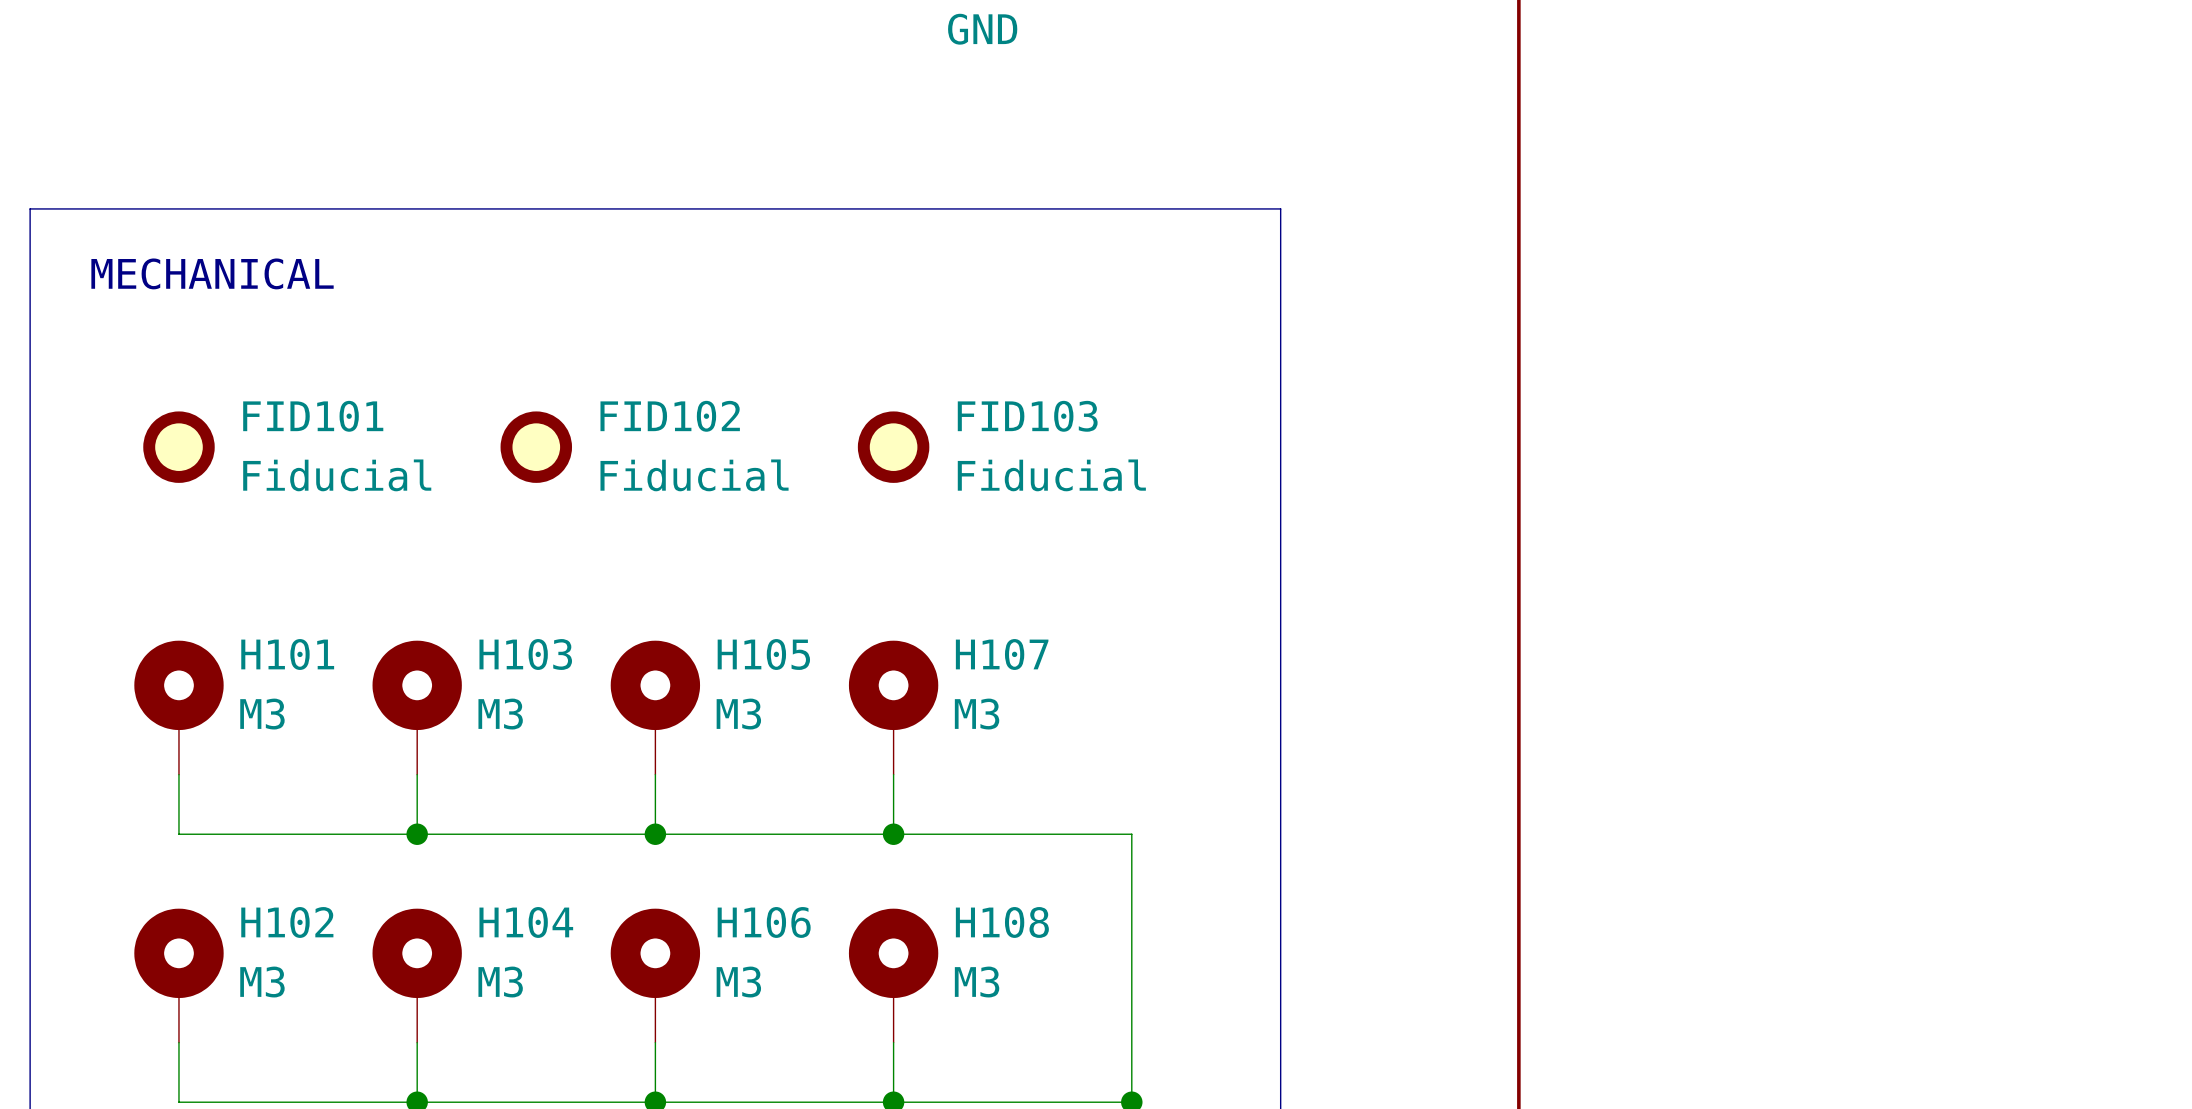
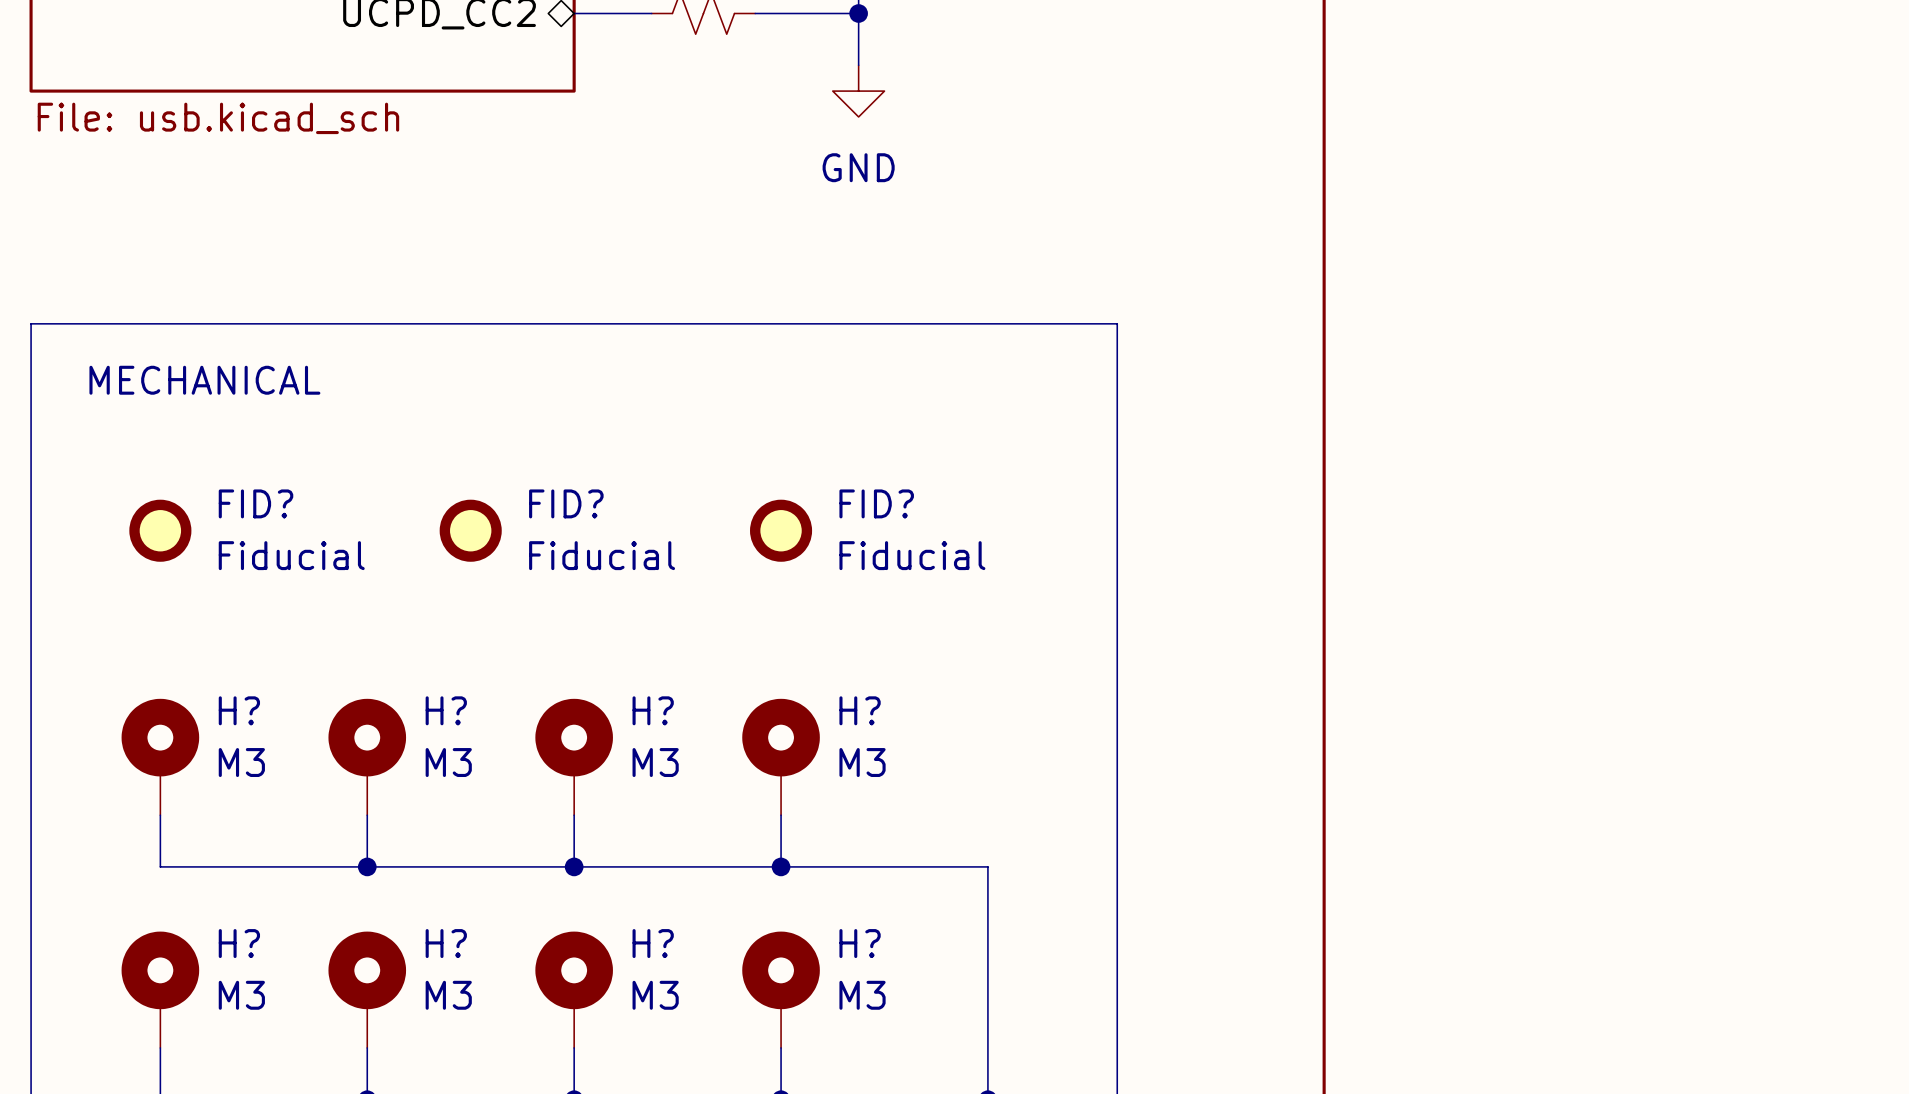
FID101 name: FID101 (313, 416) -> FID? (256, 503)
FID102 name: FID102 (670, 416) -> FID? (566, 503)
FID103 name: FID103 (1027, 416) -> FID? (876, 503)
H101 name: H101 (287, 654) -> H? (239, 710)
H103 name: H103 (525, 654) -> H? (446, 710)
H105 name: H105 (763, 654) -> H? (653, 710)
H107 name: H107 (1002, 654) -> H? (860, 710)
H102 name: H102 (287, 922) -> H? (239, 943)
H104 name: H104 (526, 922) -> H? (446, 943)
H106 name: H106 (764, 922) -> H? (653, 943)
H108 name: H108 (1002, 922) -> H? (860, 943)

